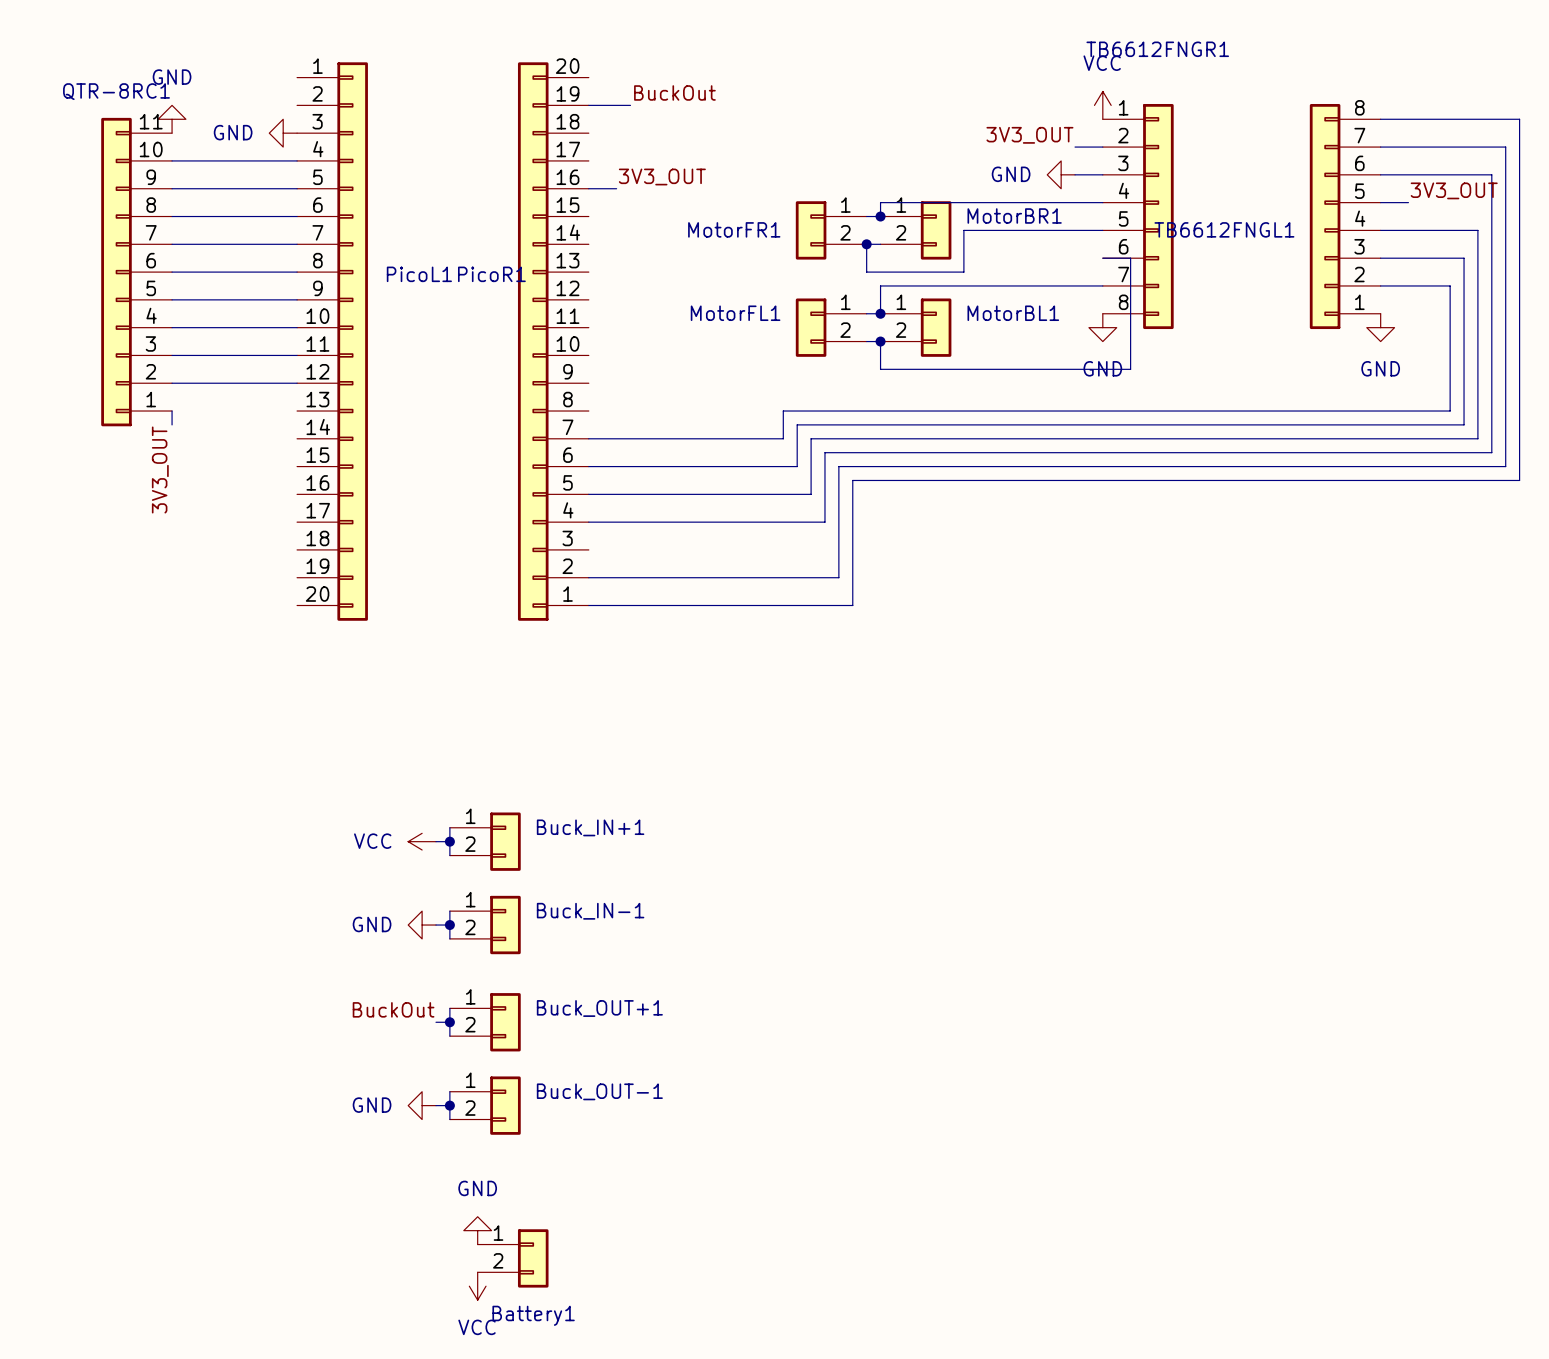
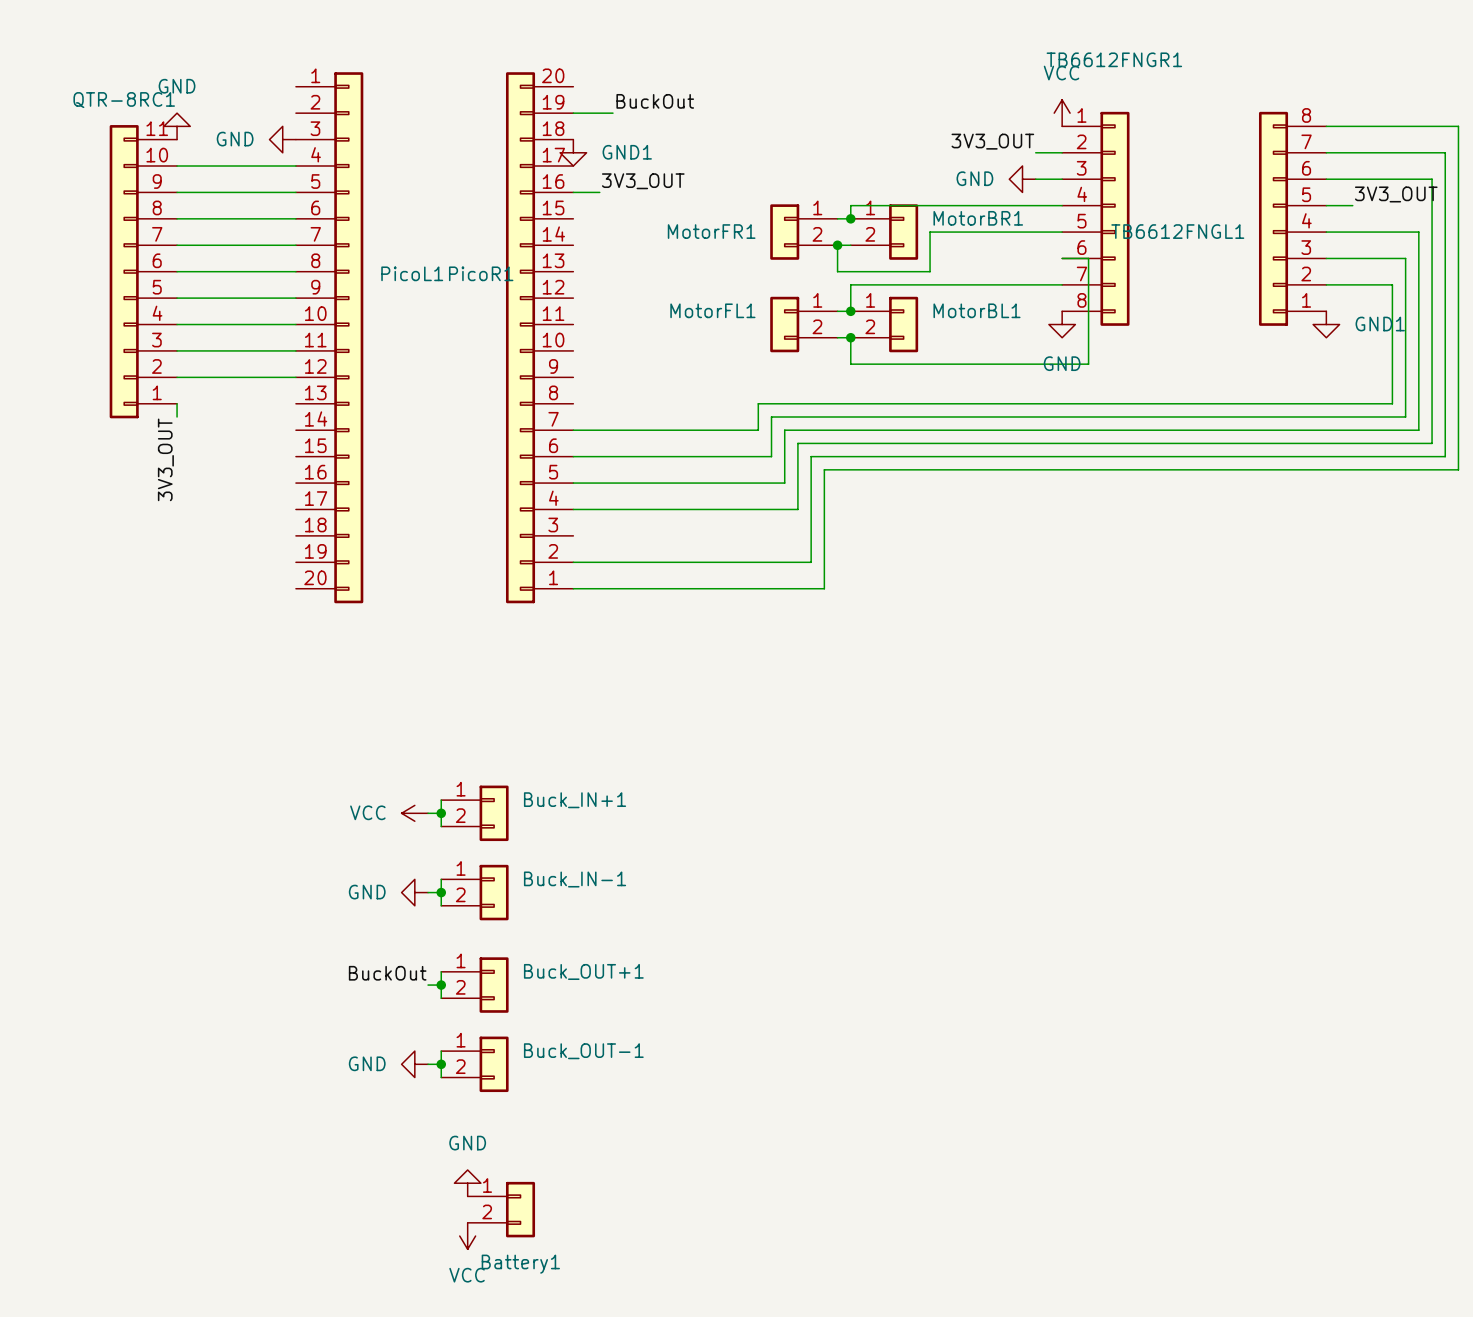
power symbol: none -> GND1 (573, 152)
power symbol: GND (1380, 327) -> GND1 (1326, 324)

